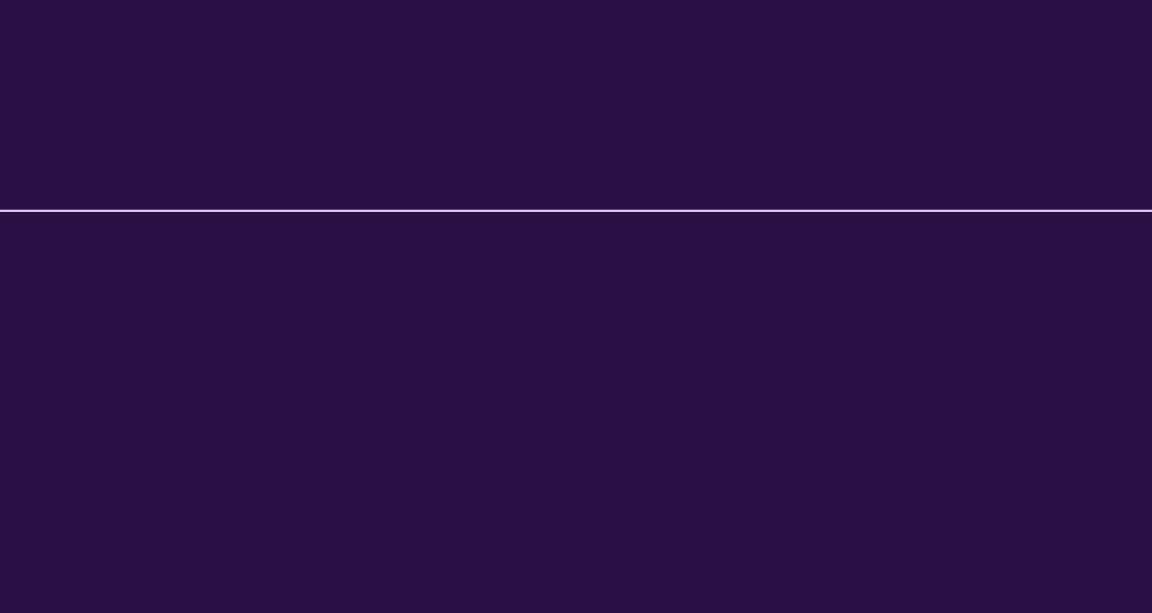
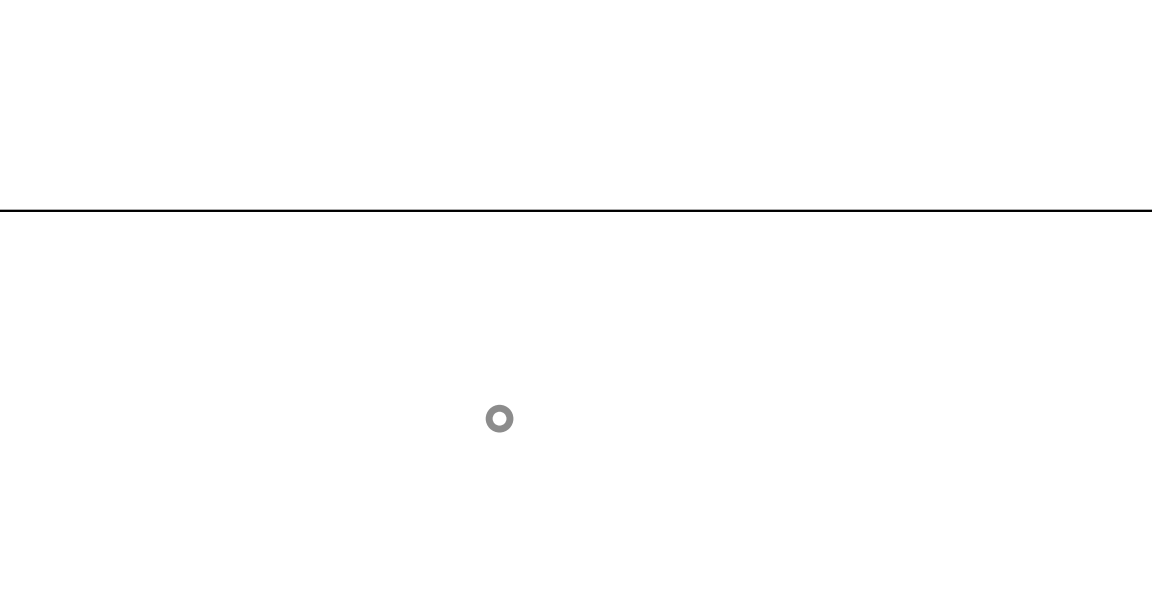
via: none -> (499, 418)

